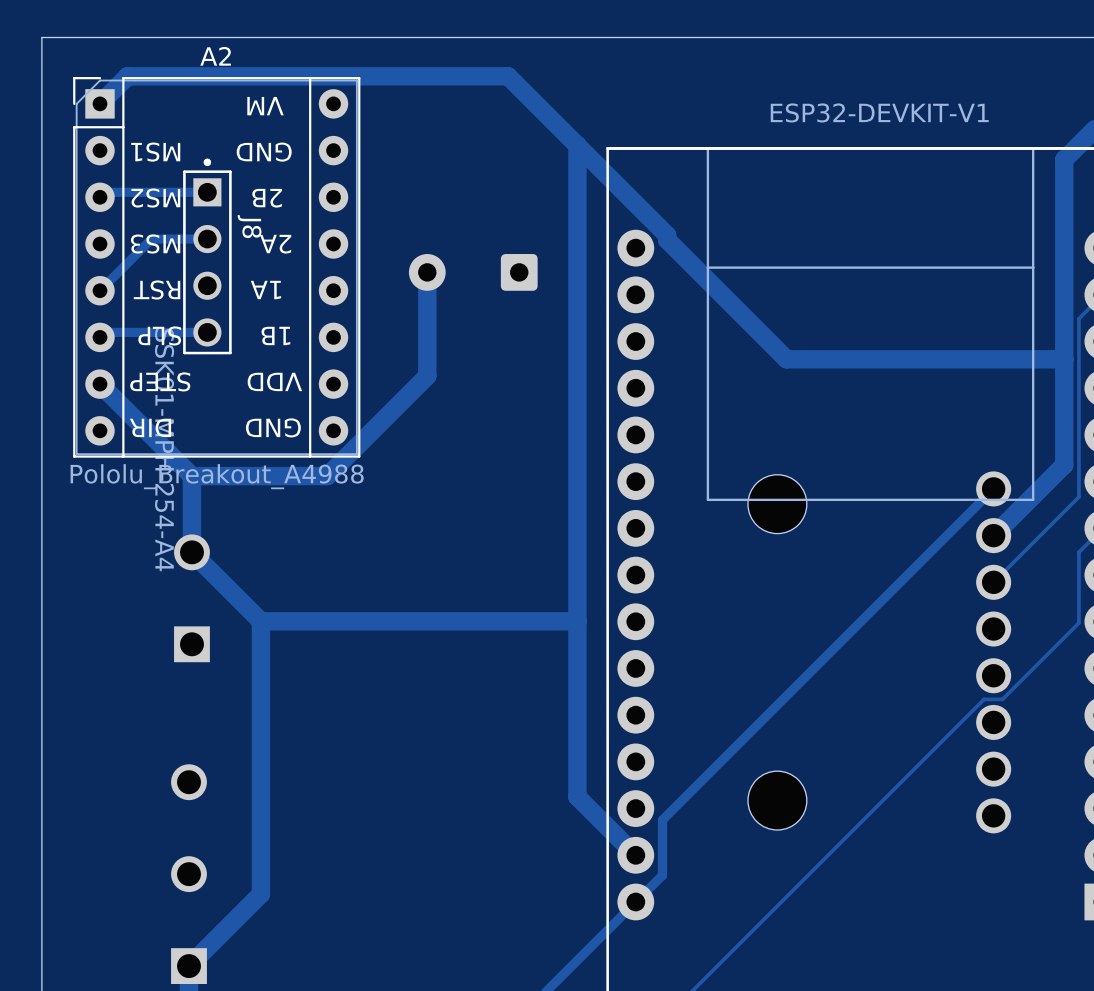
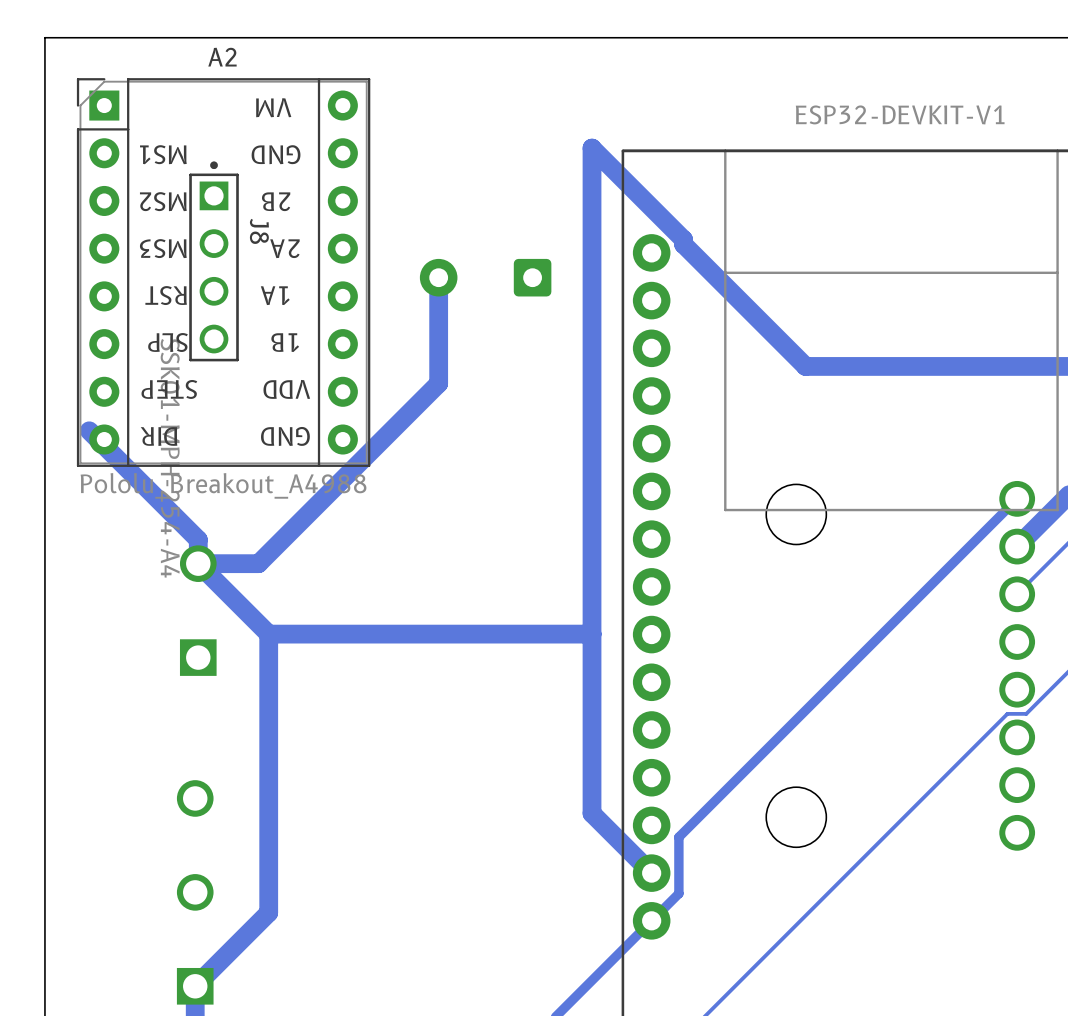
track: (100, 103) (127, 76) (508, 76) (577, 145) -> none
track: (207, 192) (104, 192) (100, 197) -> none
track: (207, 239) (151, 239) (100, 290) -> none
track: (207, 332) (104, 332) (100, 337) -> none
track: (100, 384) (191, 476) -> none
track: (191, 476) (191, 528) -> (89, 430) (198, 539)
track: (327, 476) (191, 476) -> (336, 485) (258, 563) (198, 563)

